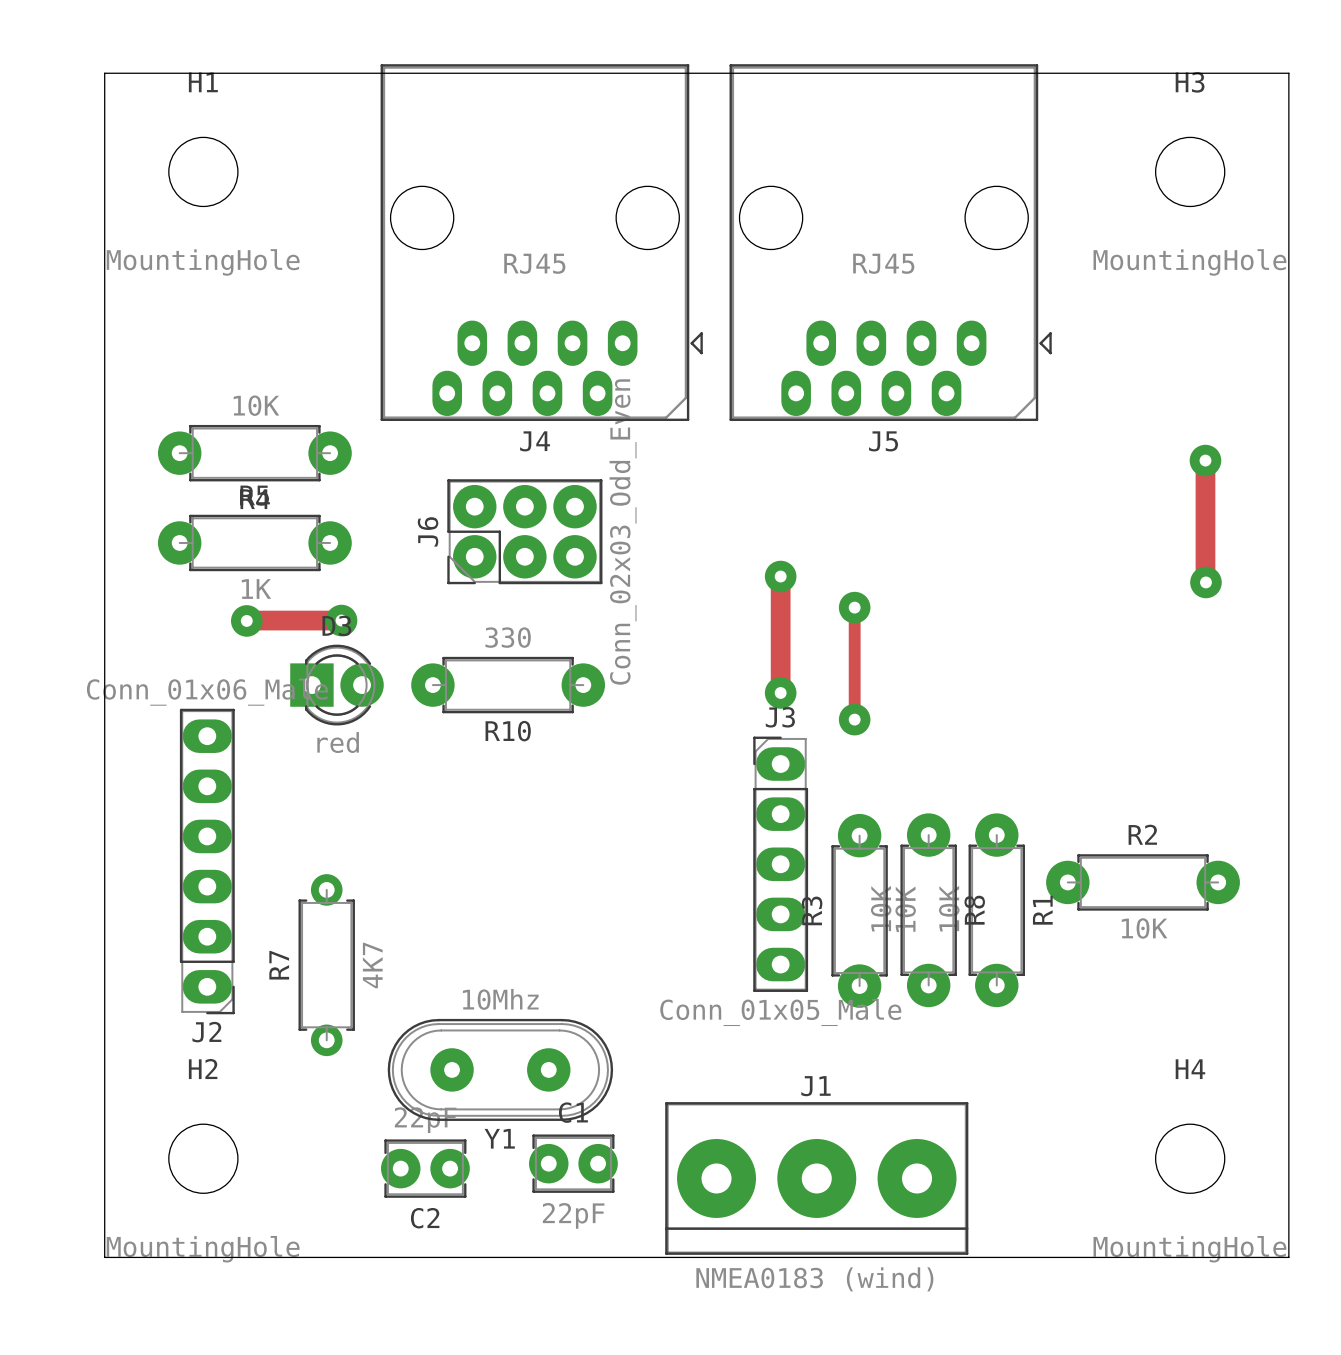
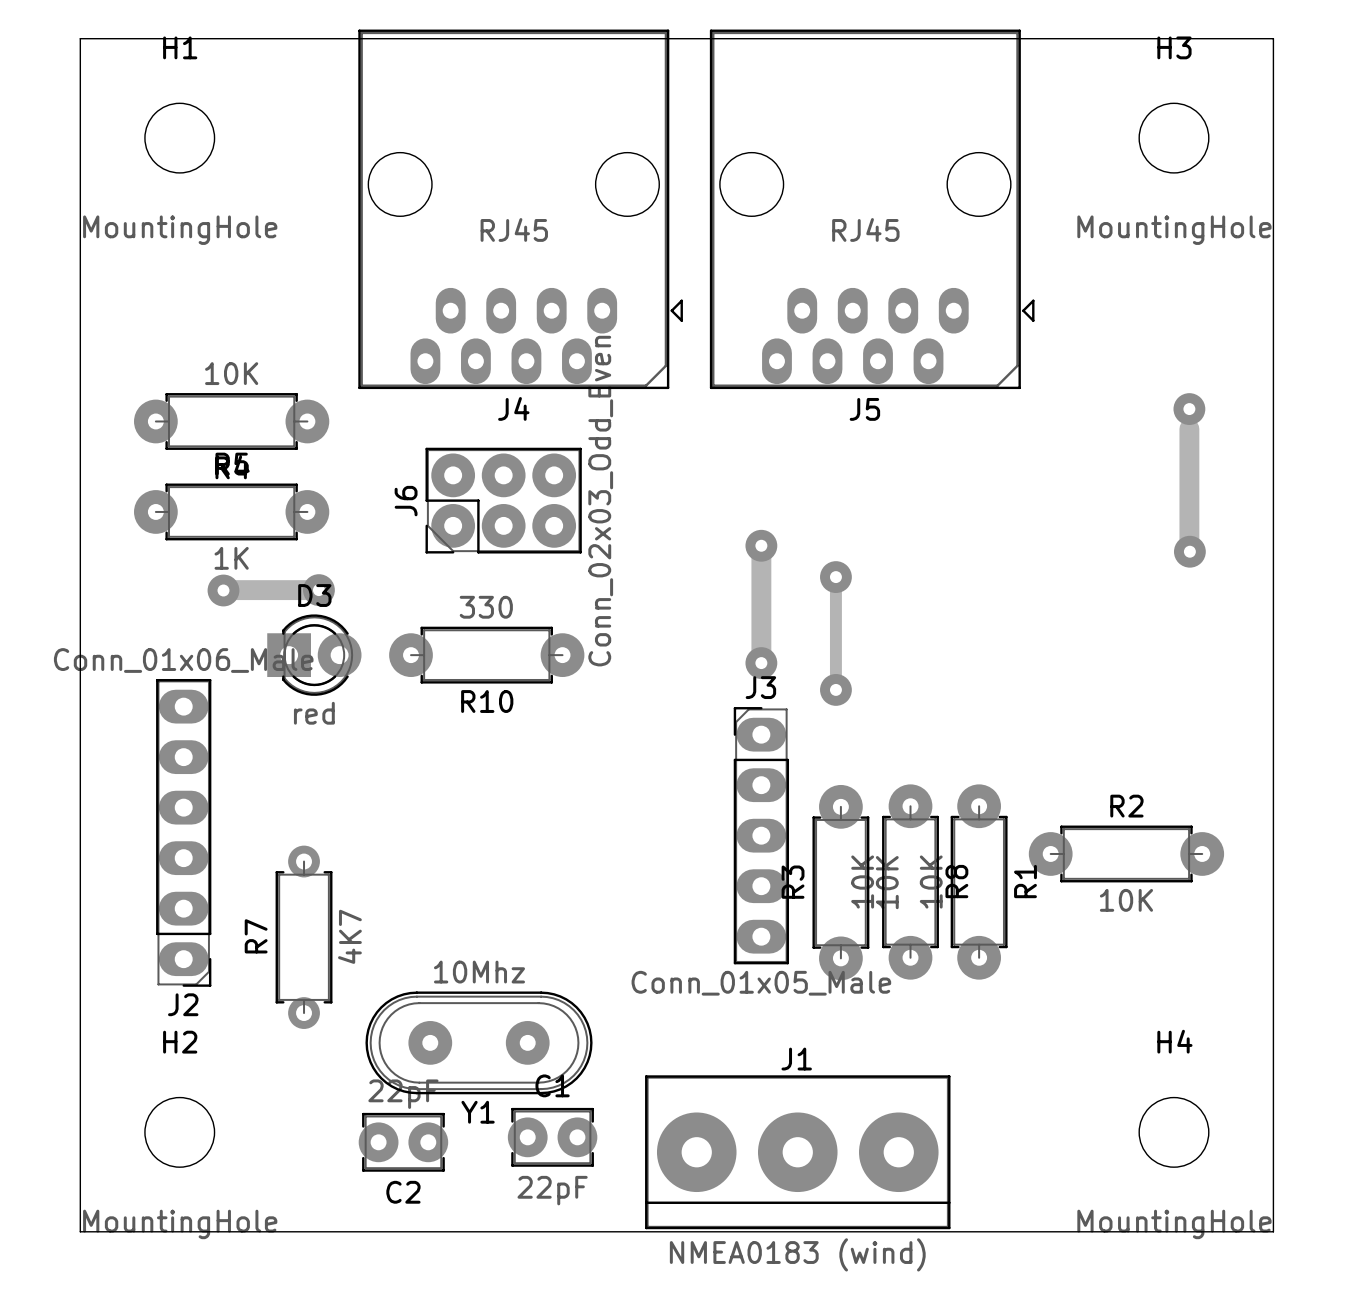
via position: (1205, 460) -> (1189, 409)

